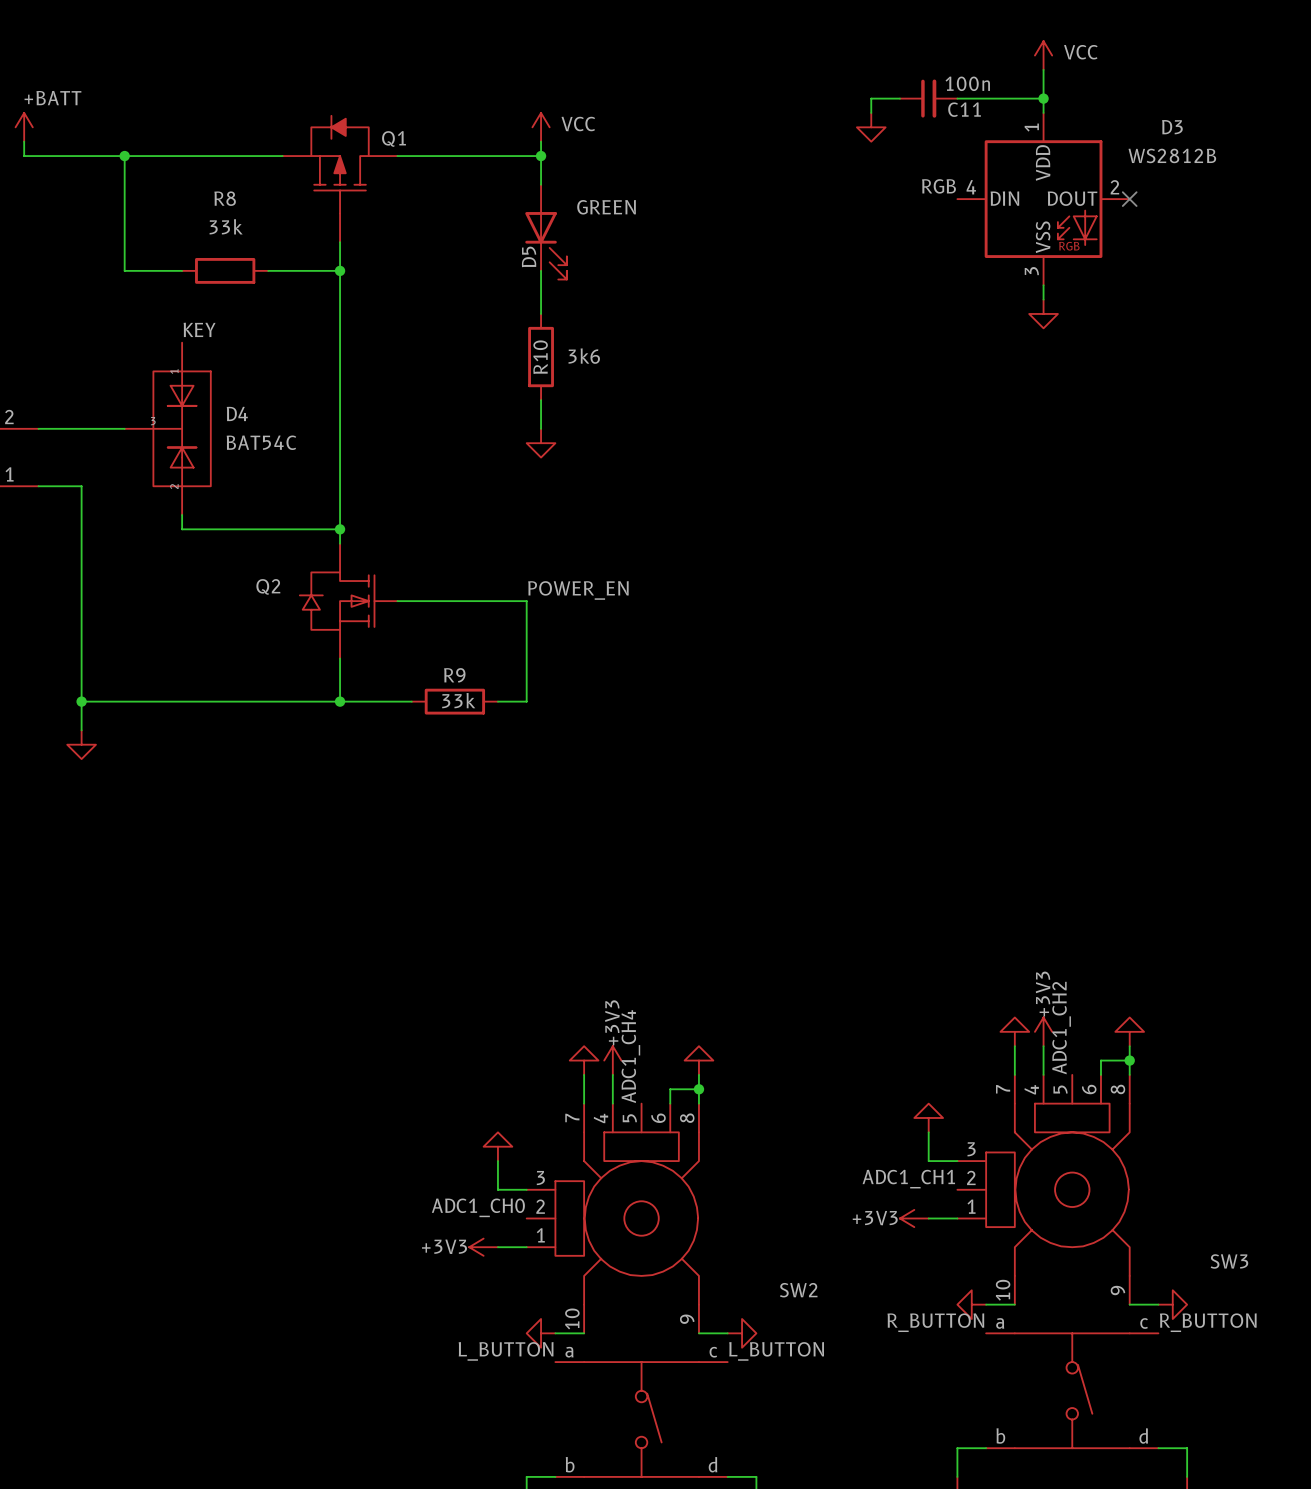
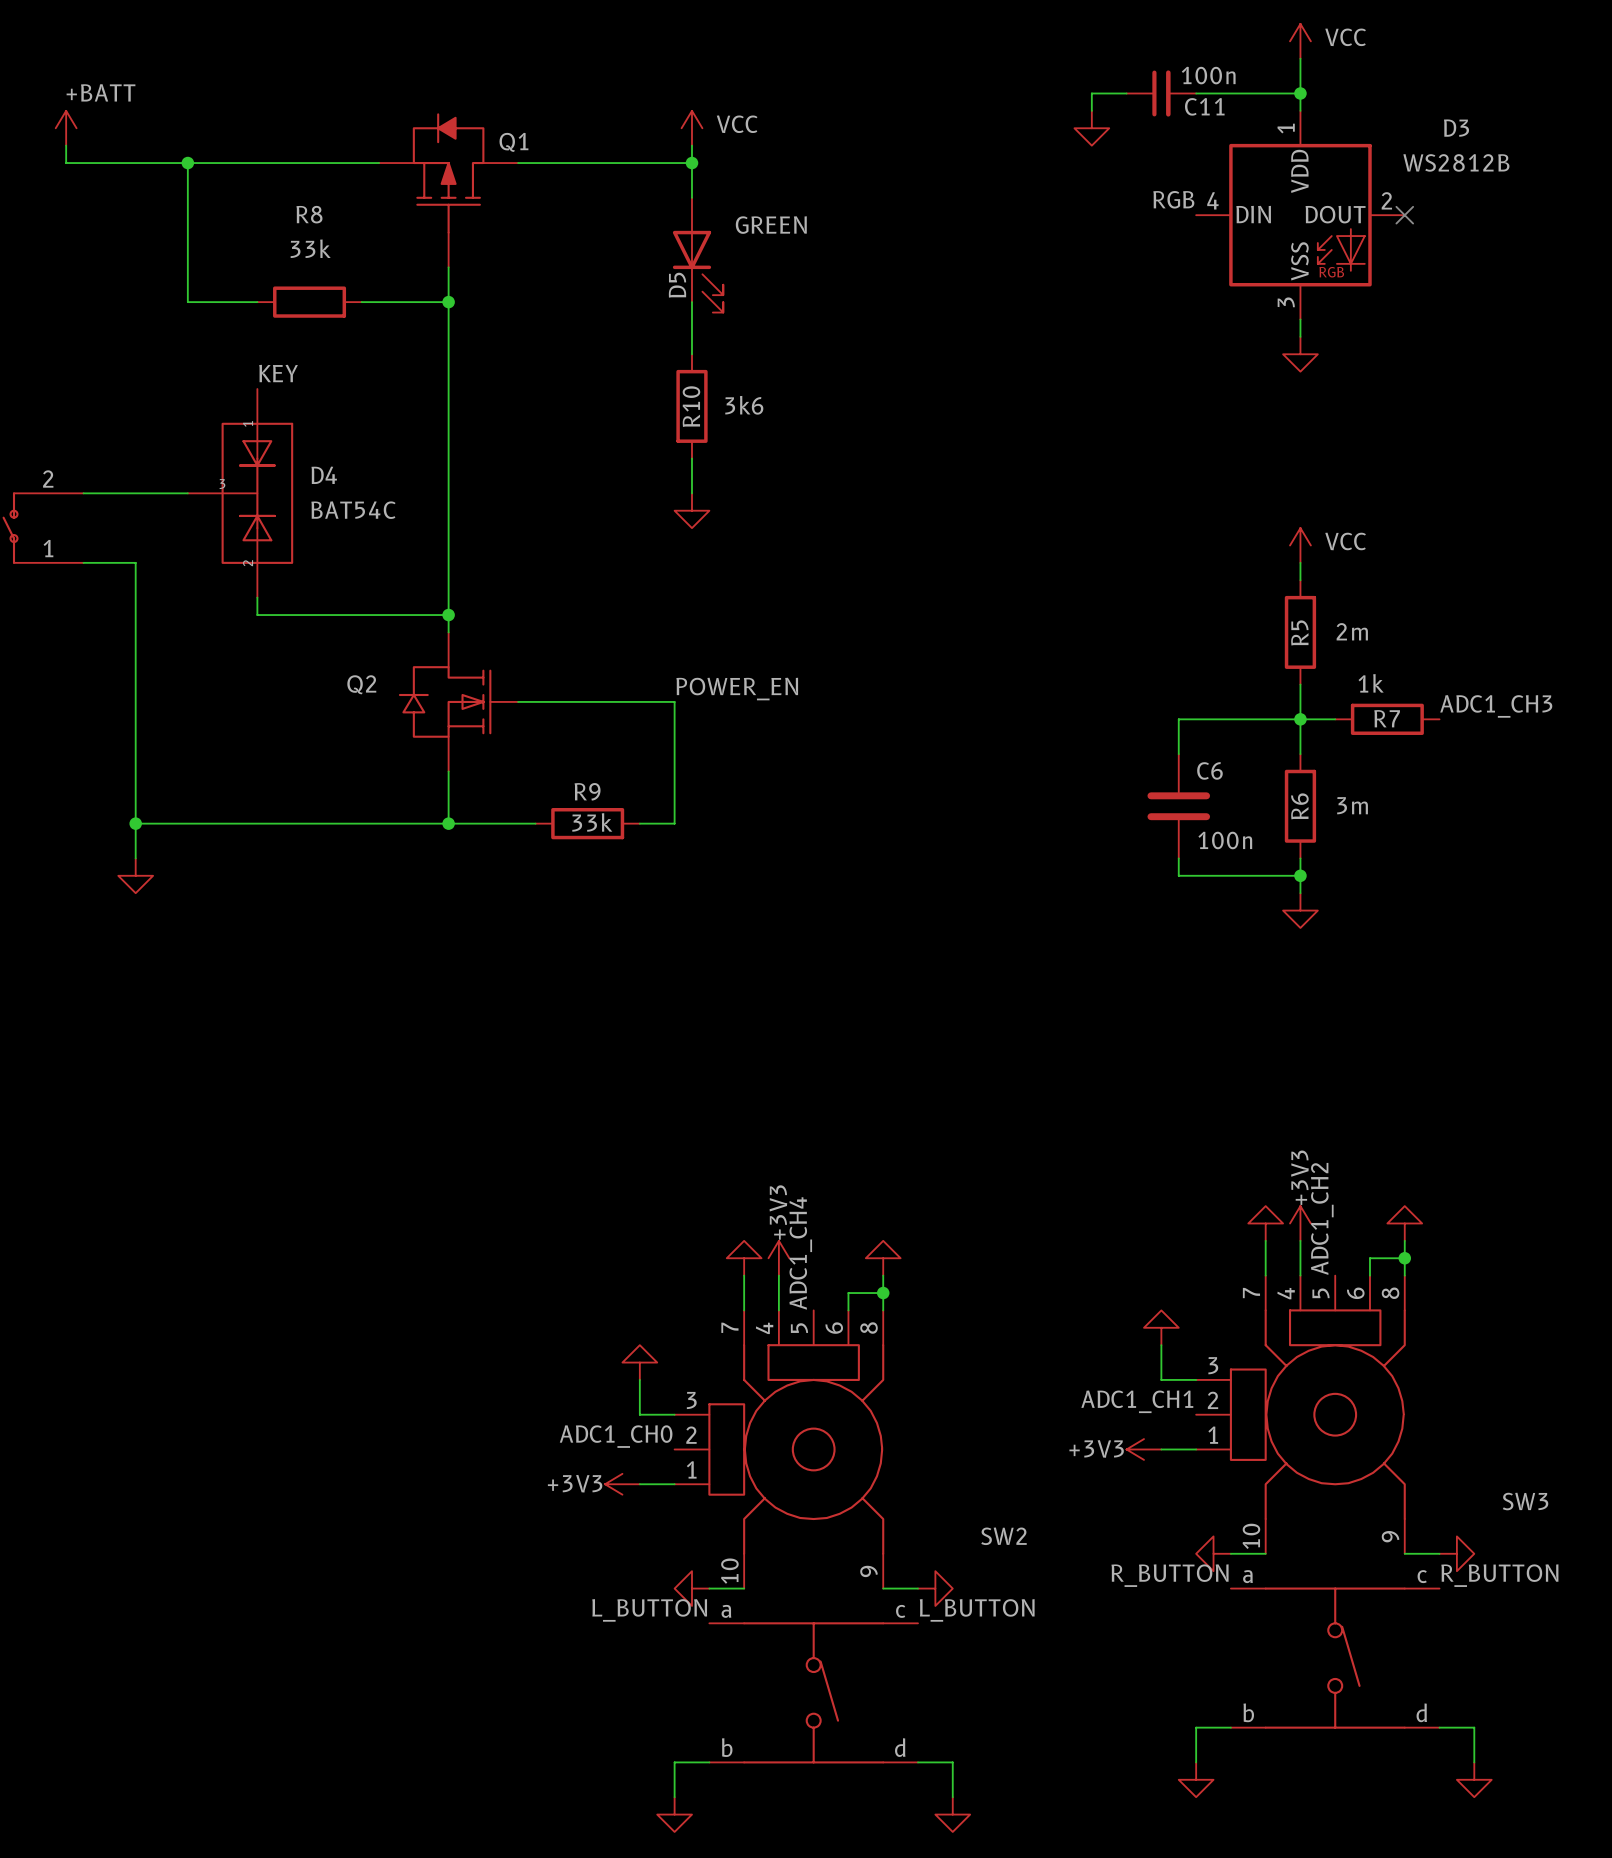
power symbol: none -> VCC (1300, 545)
wire: none -> (1300, 562) (1300, 580)
R5: none -> 2m (1300, 632)
wire: none -> (1300, 684) (1300, 754)
label: none -> ADC1_CH3 (1496, 706)
junction: none -> (1300, 719)
wire: none -> (1335, 719) (1178, 719) (1178, 754)
R7: none -> 1k (1387, 719)
C6: none -> 100n (1178, 806)
R6: none -> 3m (1300, 806)
wire: none -> (1178, 858) (1178, 875) (1300, 875)
wire: none -> (1300, 858) (1300, 893)
junction: none -> (1300, 875)
power symbol: none -> (1300, 910)

